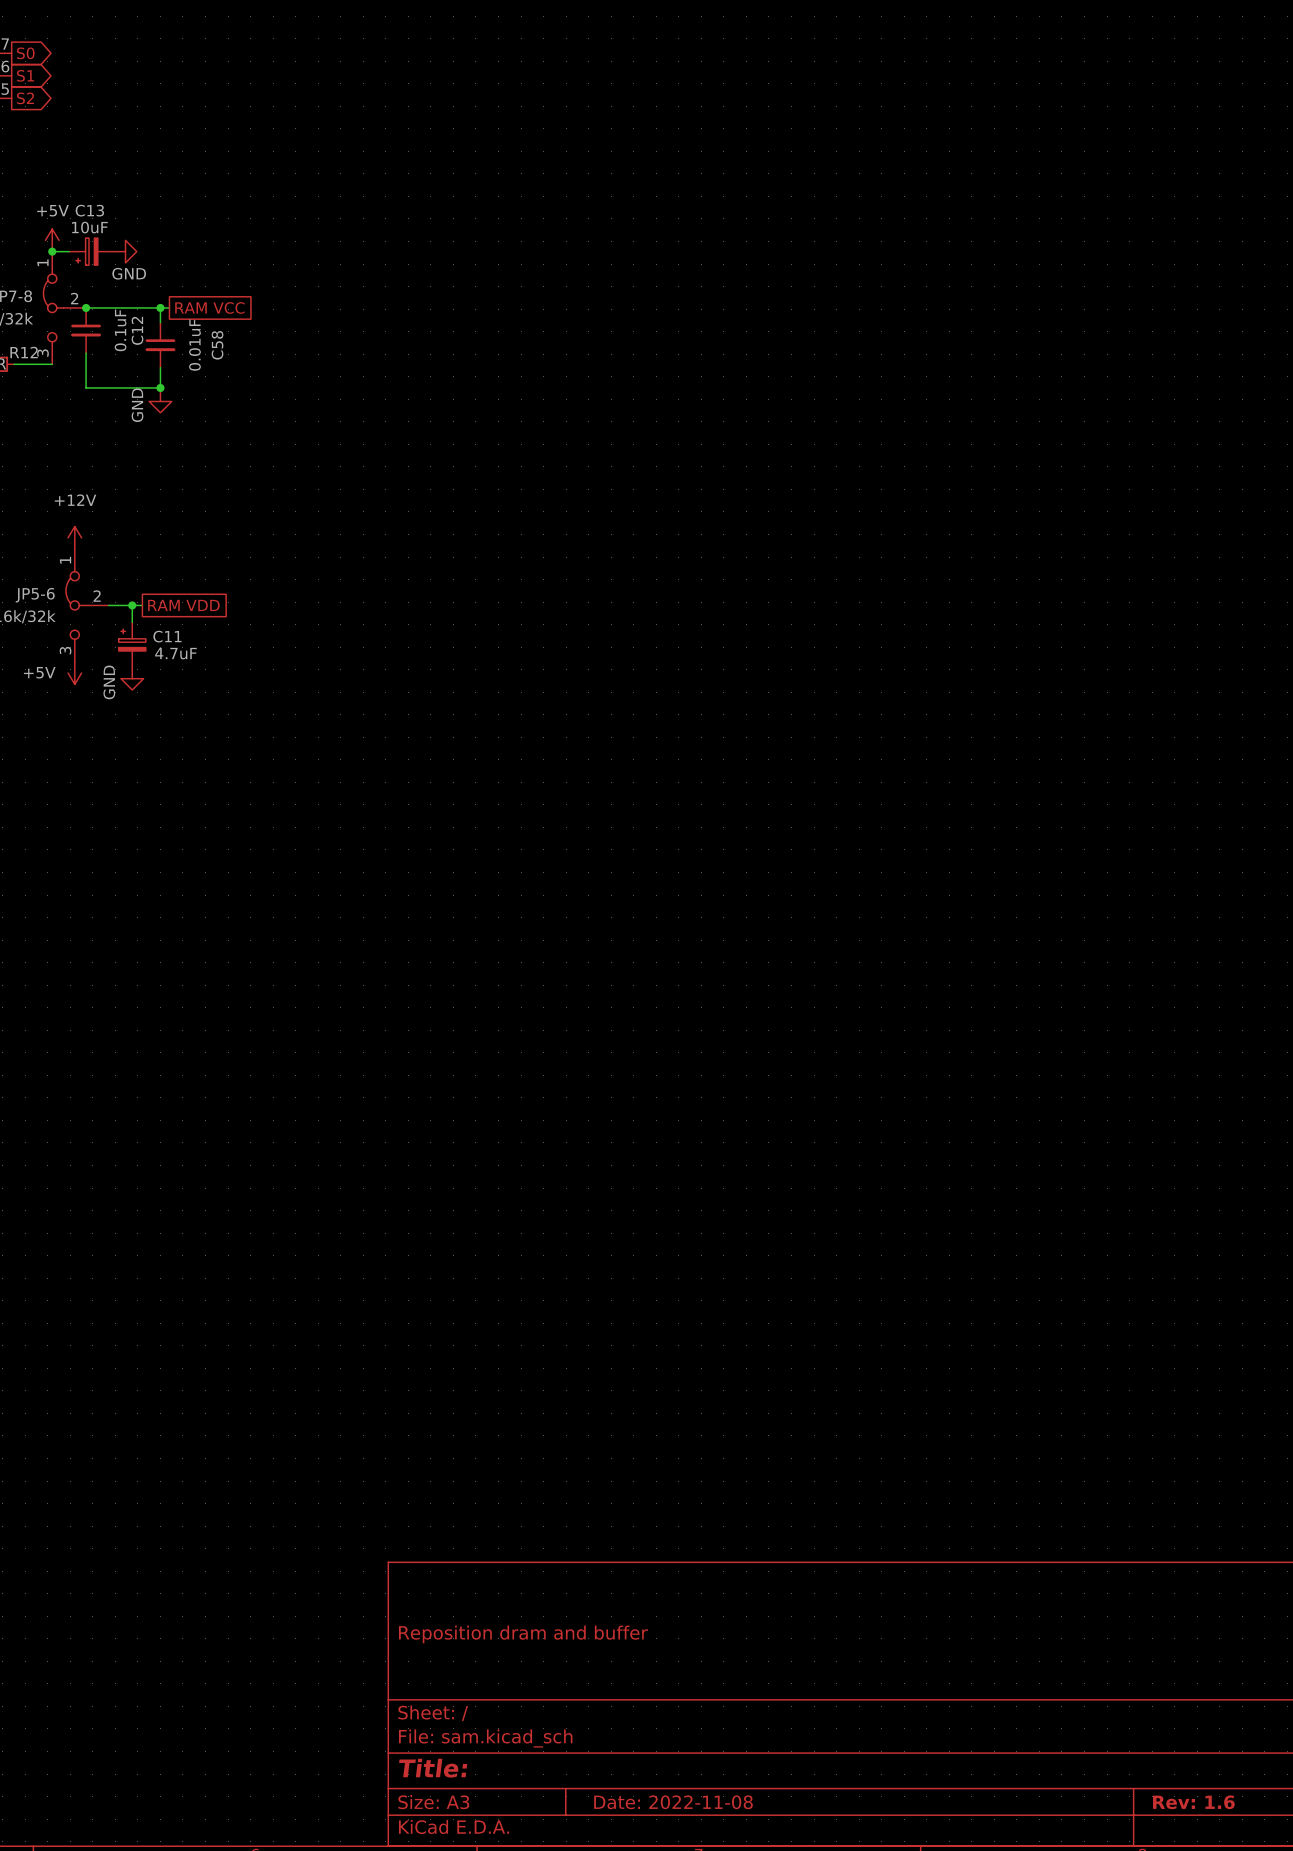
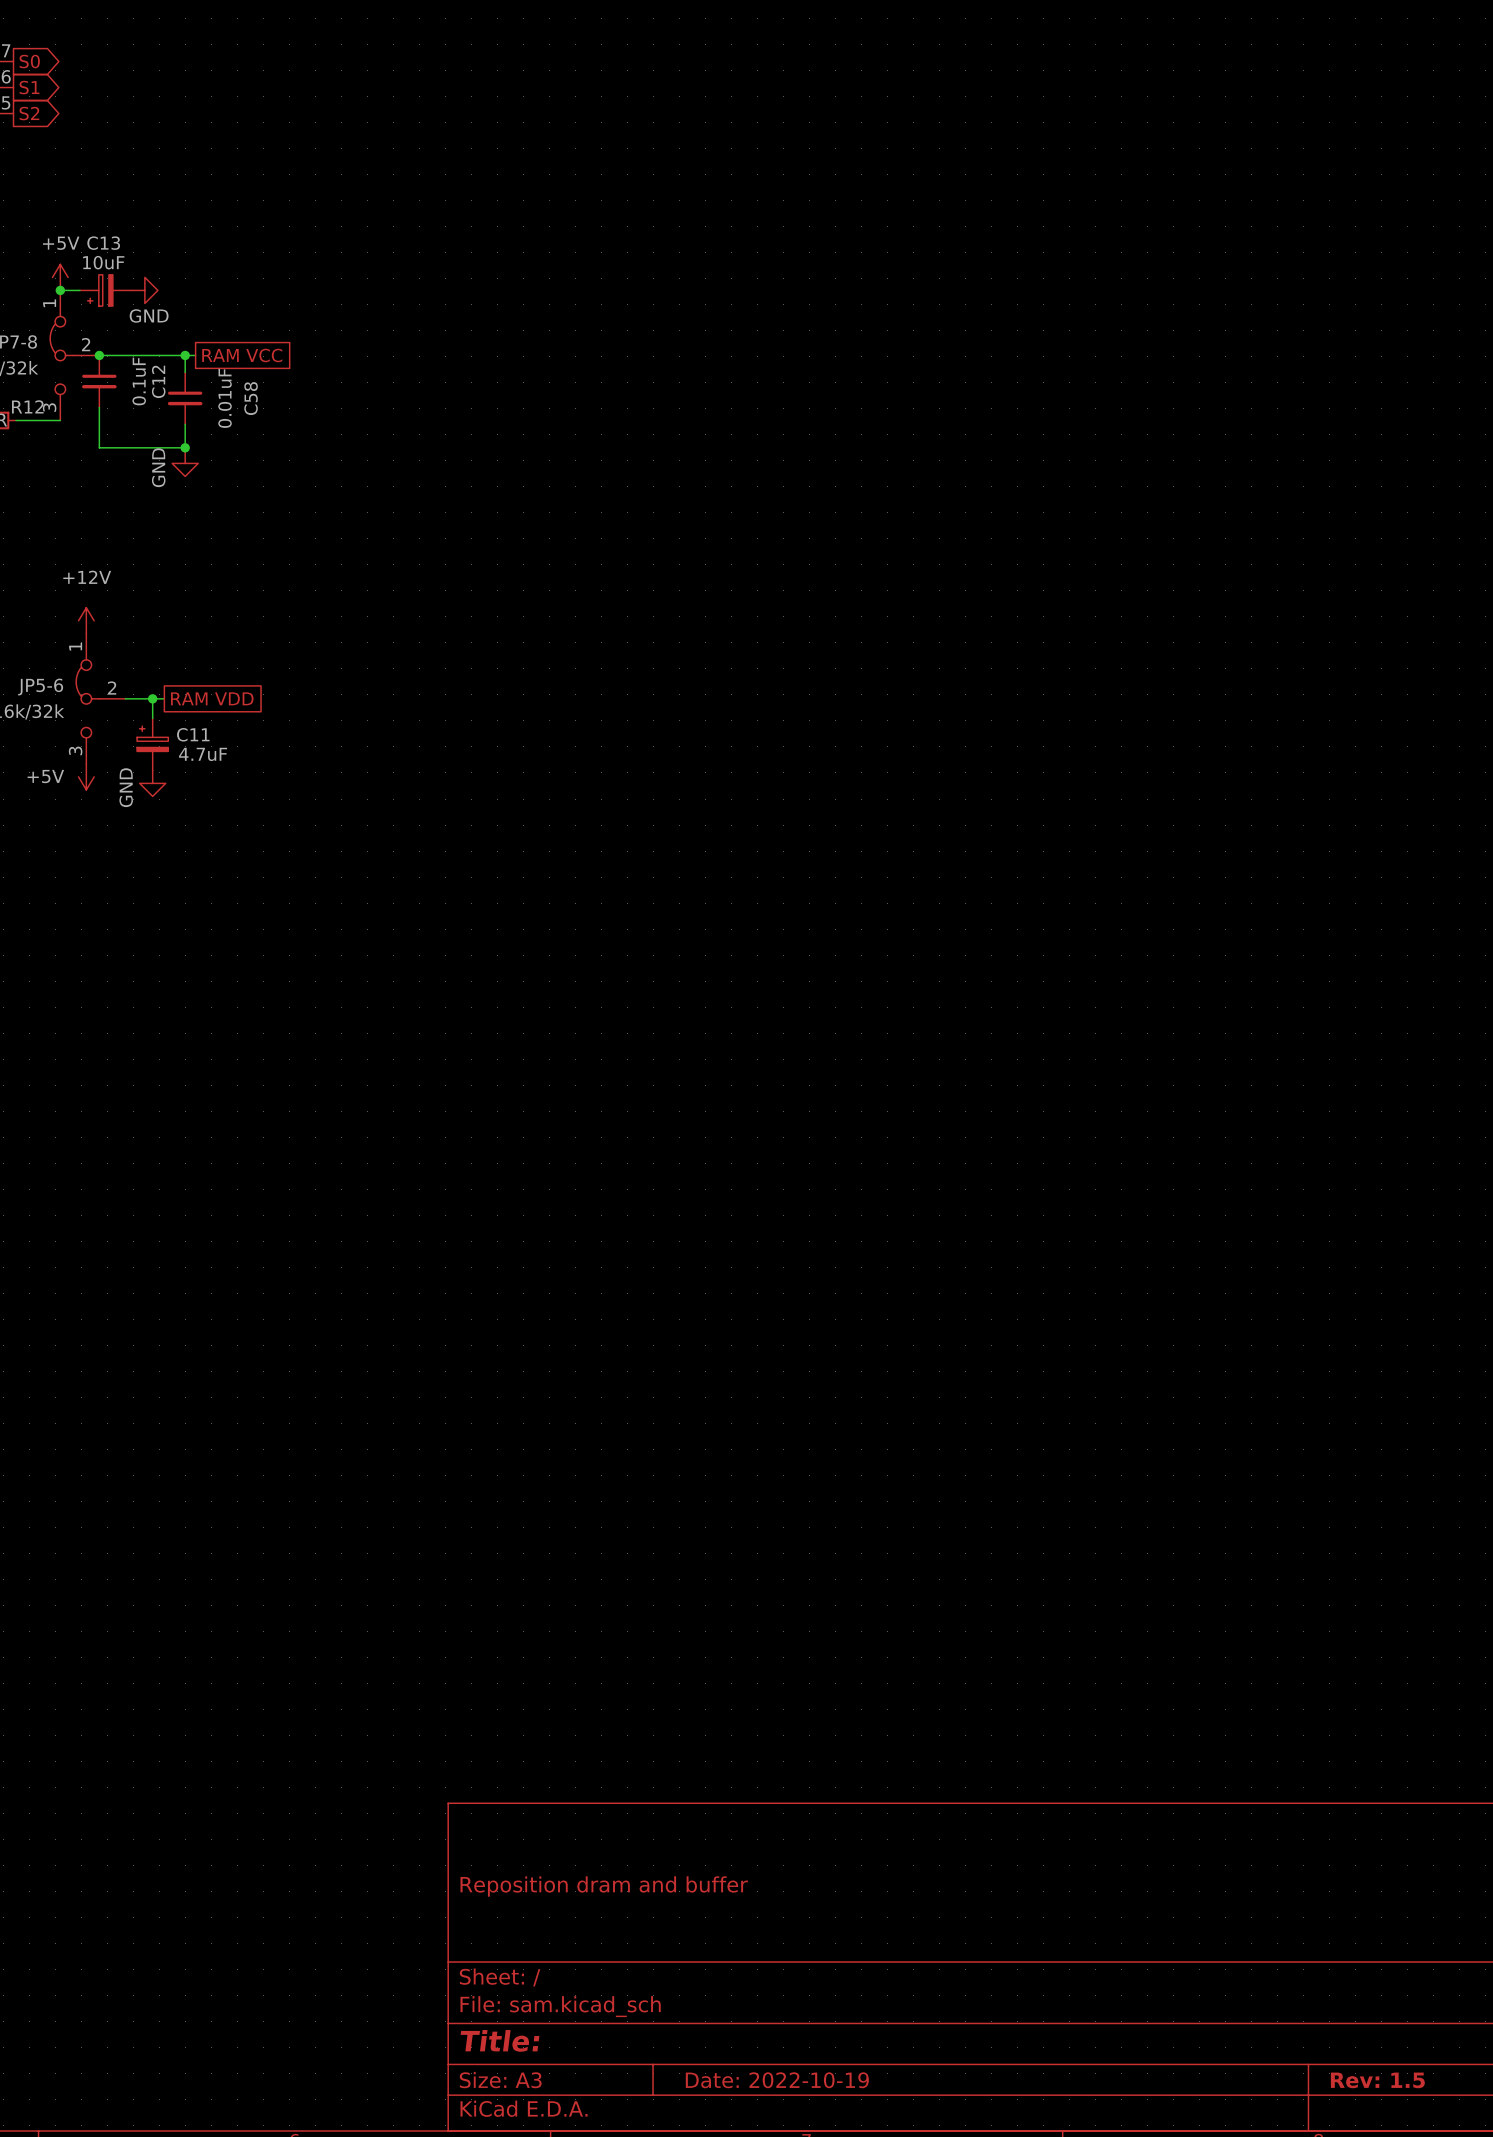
title block: Date: 2022-11-08 (673, 1802) -> Date: 2022-10-19 (777, 2080)
title block: Rev: 1.6 (1193, 1802) -> Rev: 1.5 (1377, 2080)

